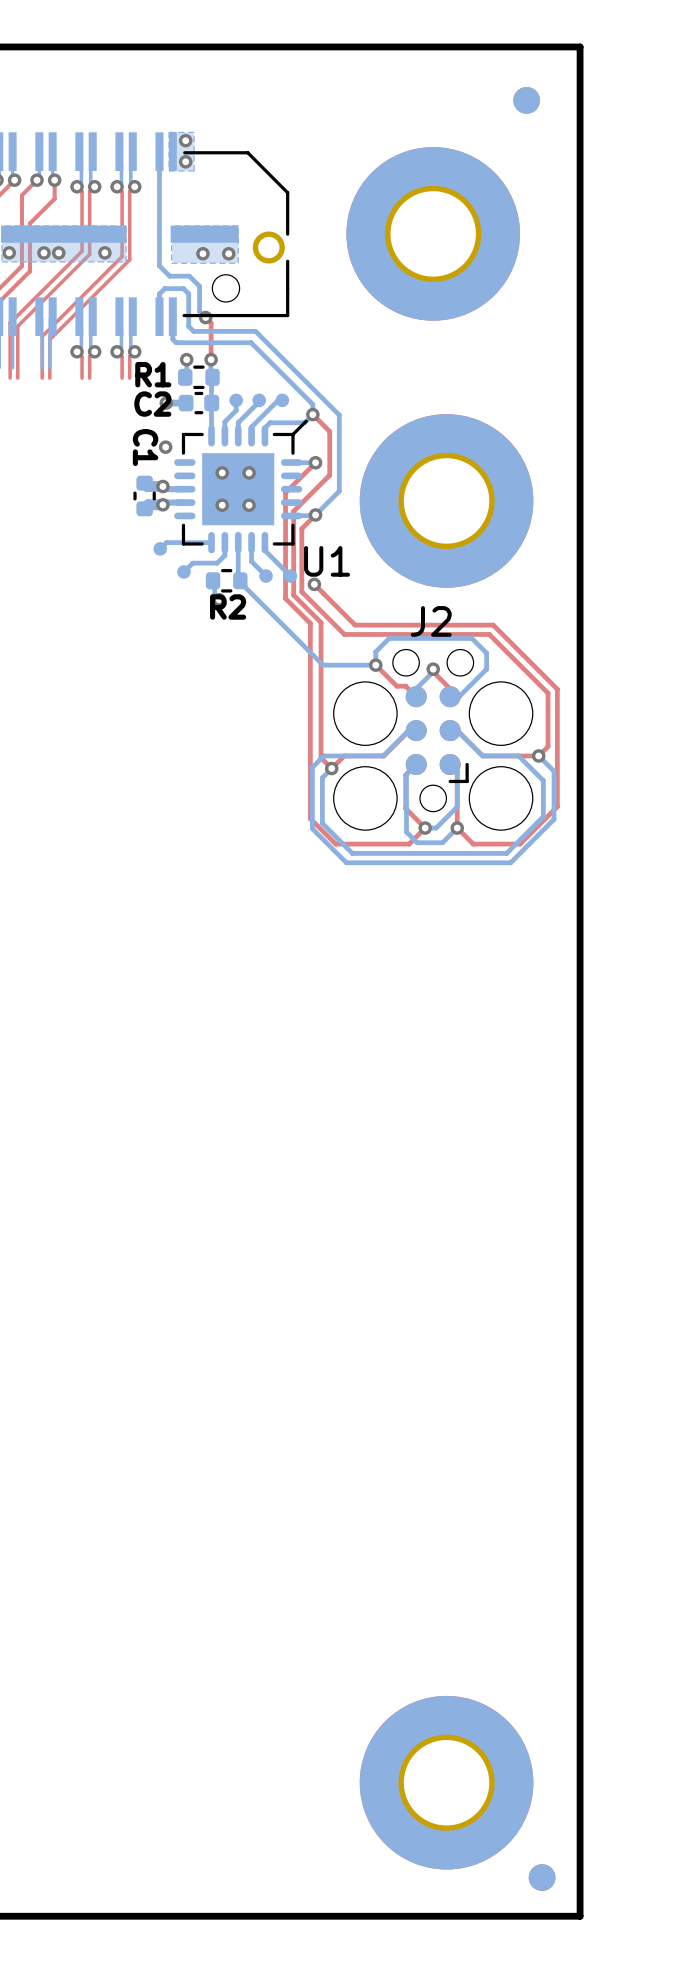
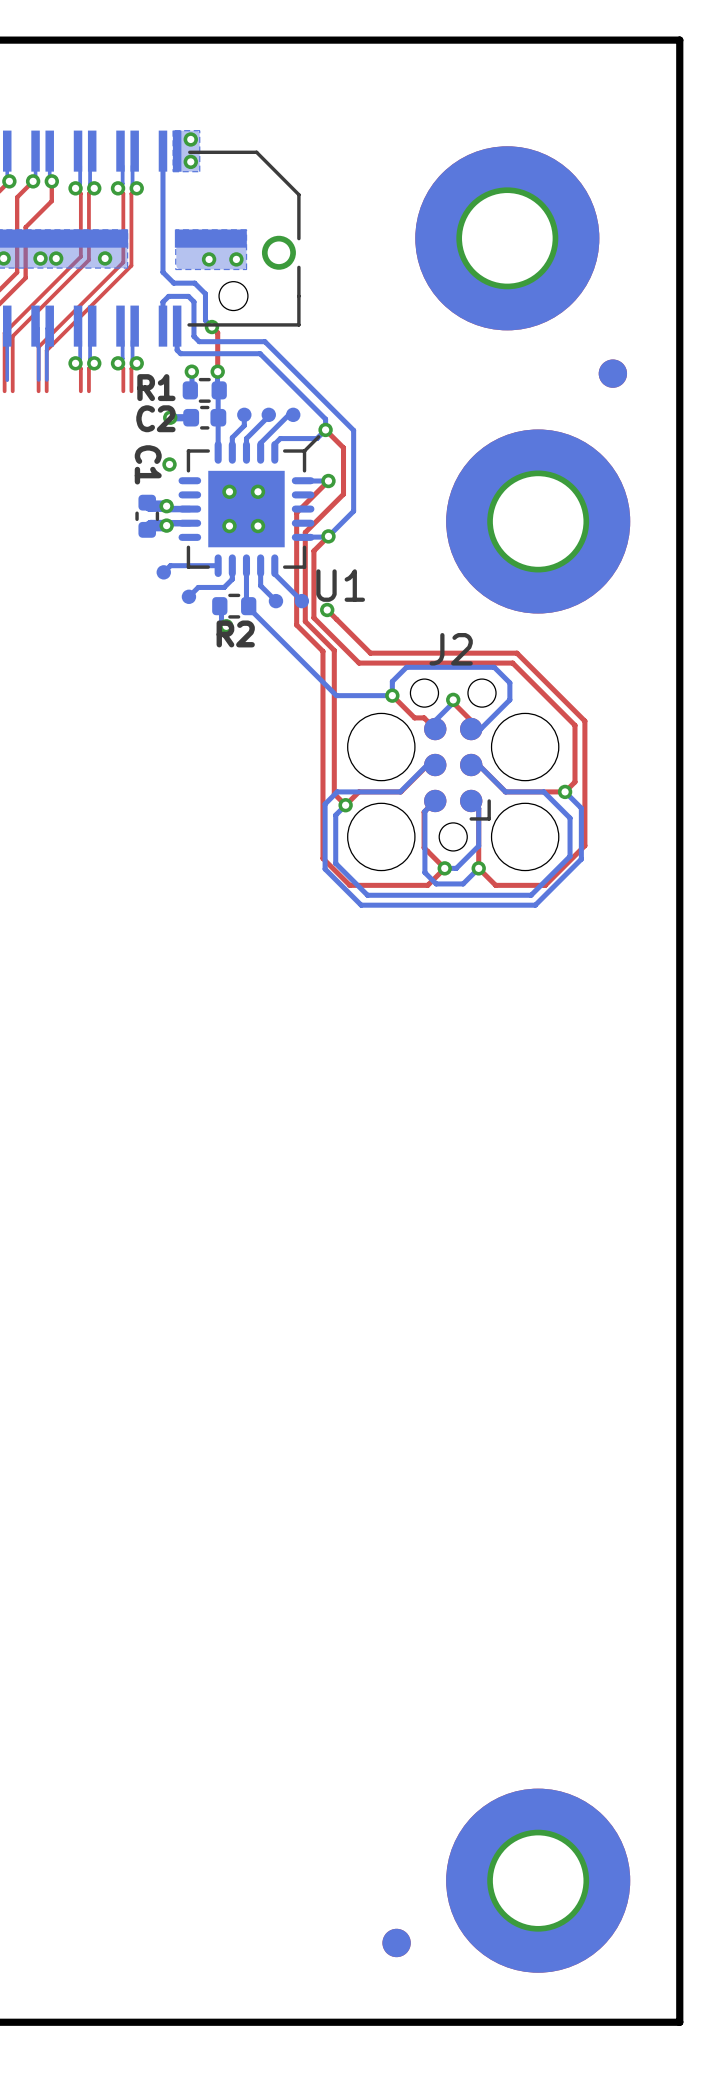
board edge: (580, 46) (580, 1916) -> (608, 40) (679, 40) (679, 2022) (608, 2022)
part position: (526, 100) -> (612, 373)
part position: (433, 233) -> (507, 238)
part position: (446, 500) -> (538, 521)
part position: (446, 1782) -> (538, 1880)
part position: (542, 1877) -> (396, 1942)

